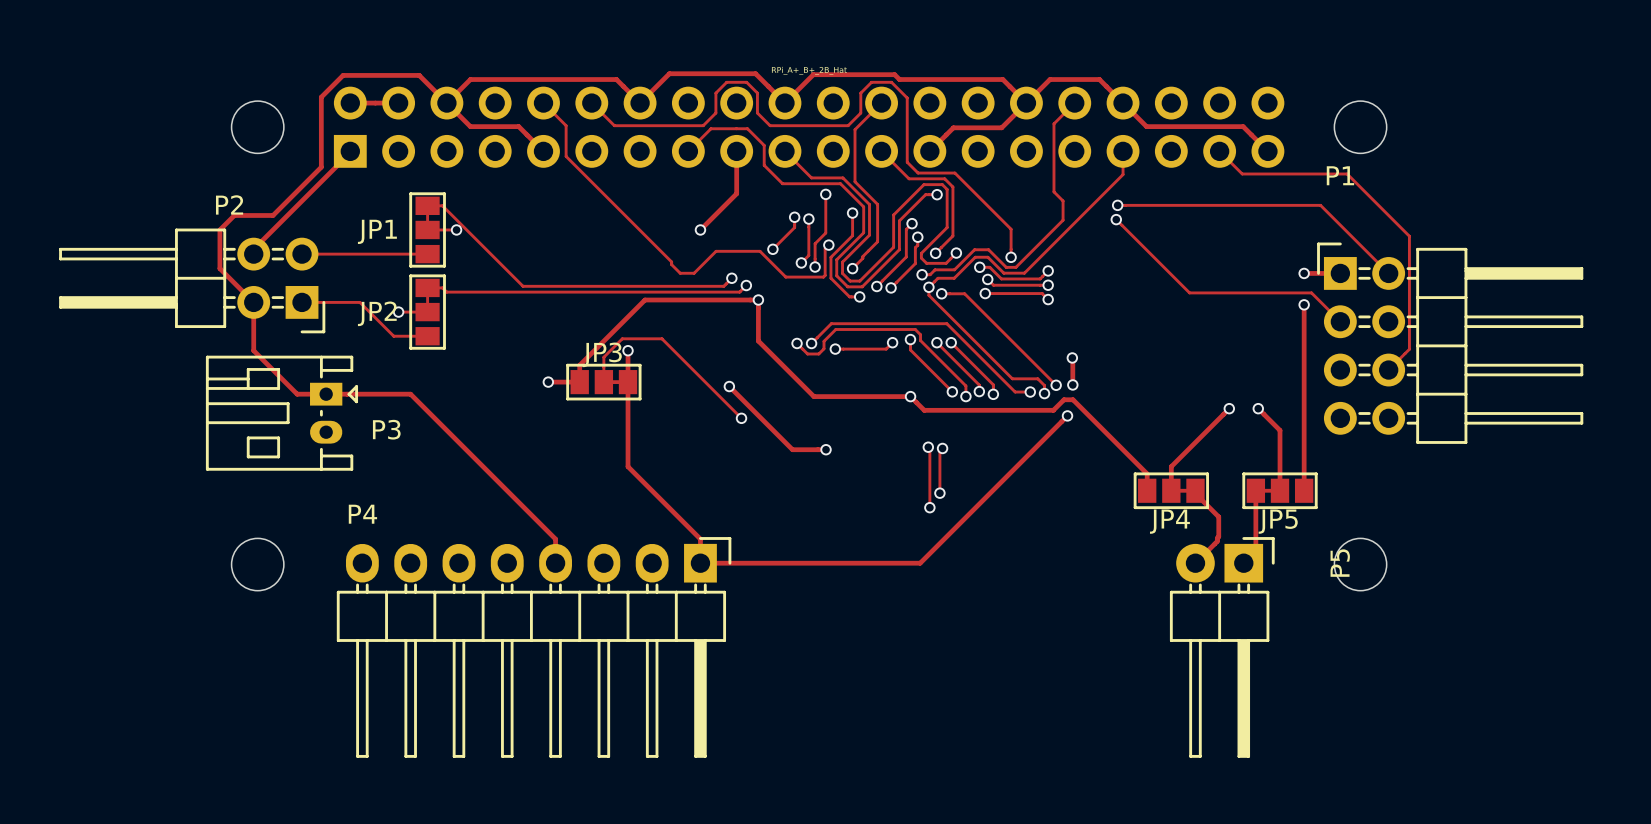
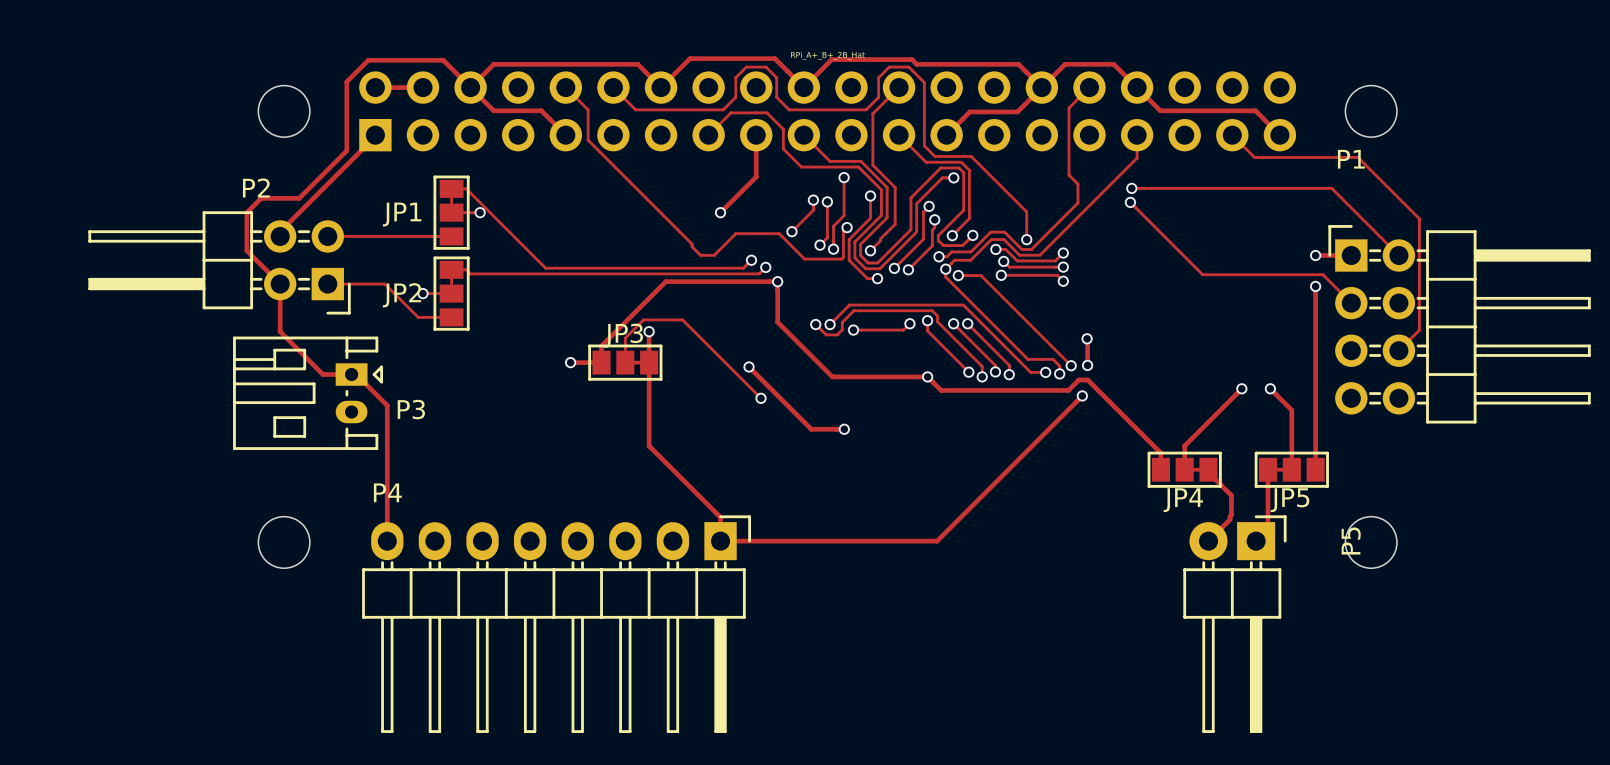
track: (330, 394) (410, 394) (555, 539) (555, 563) -> (356, 374) (387, 405) (387, 541)
track: (928, 447) (929, 448) (929, 507) -> none
via: (928, 447) -> none
track: (942, 448) (939, 451) (939, 493) -> none
via: (942, 448) -> none
via: (939, 493) -> none
via: (929, 507) -> none

